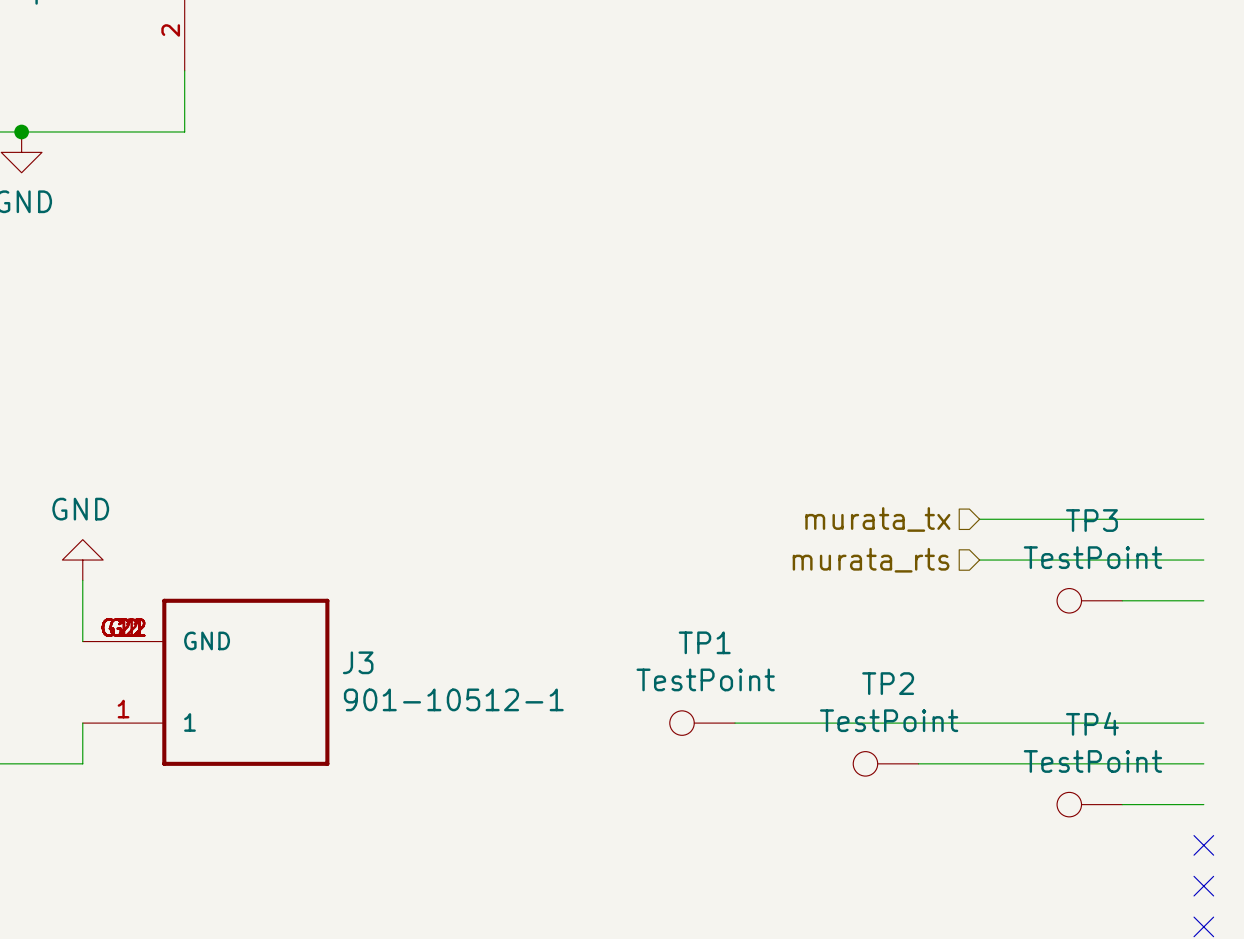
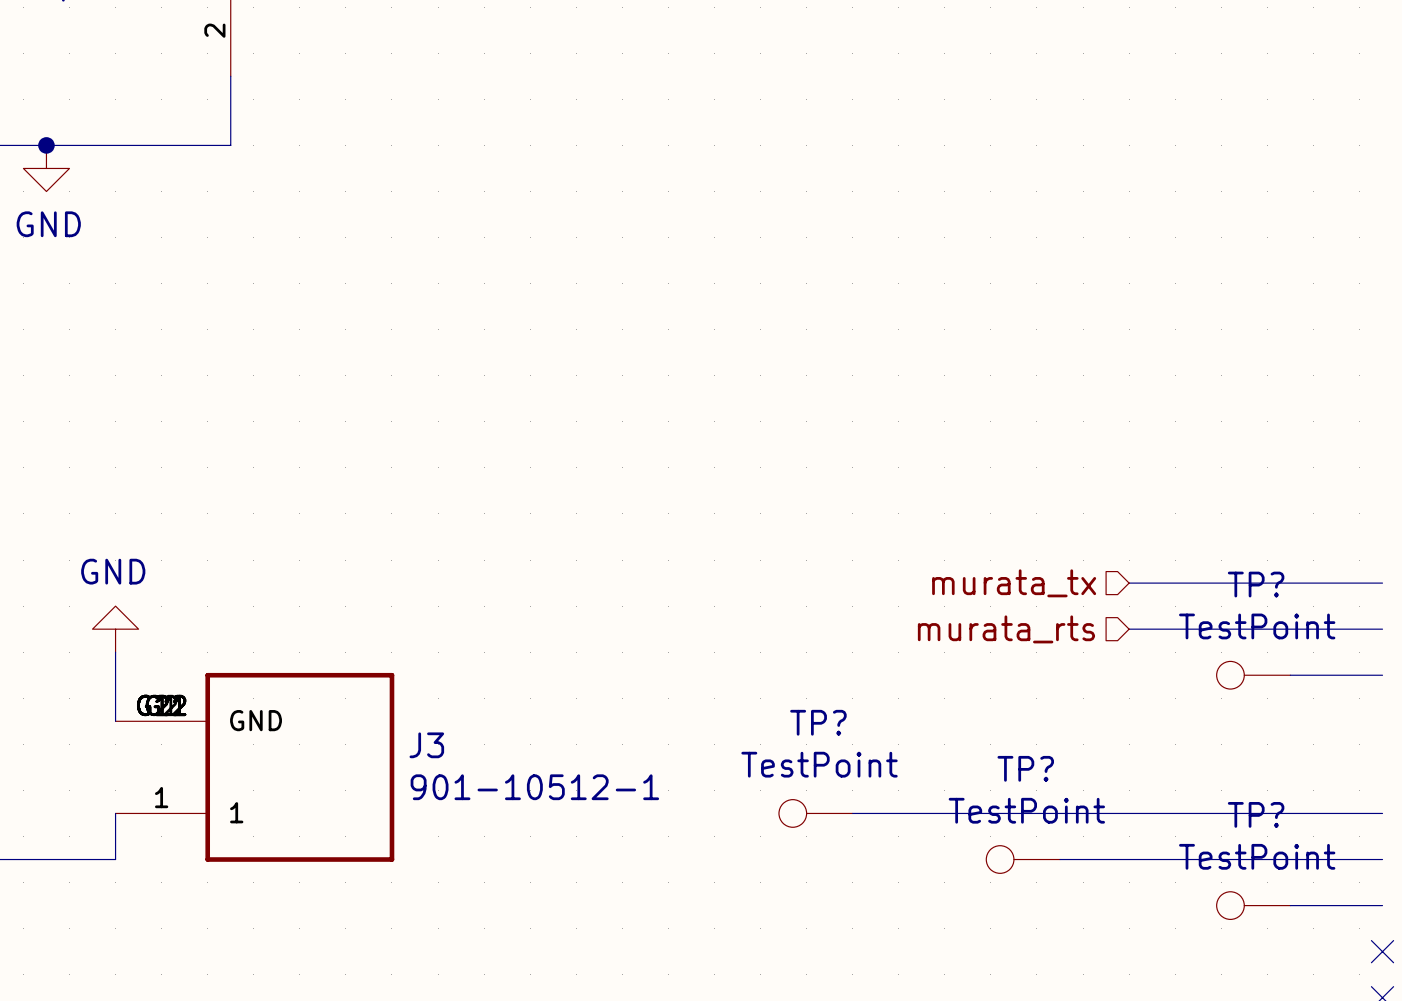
TP3 name: TP3 (1091, 520) -> TP? (1256, 584)
TP1 name: TP1 (704, 642) -> TP? (818, 722)
TP2 name: TP2 (888, 683) -> TP? (1025, 768)
TP4 name: TP4 (1092, 723) -> TP? (1256, 814)

